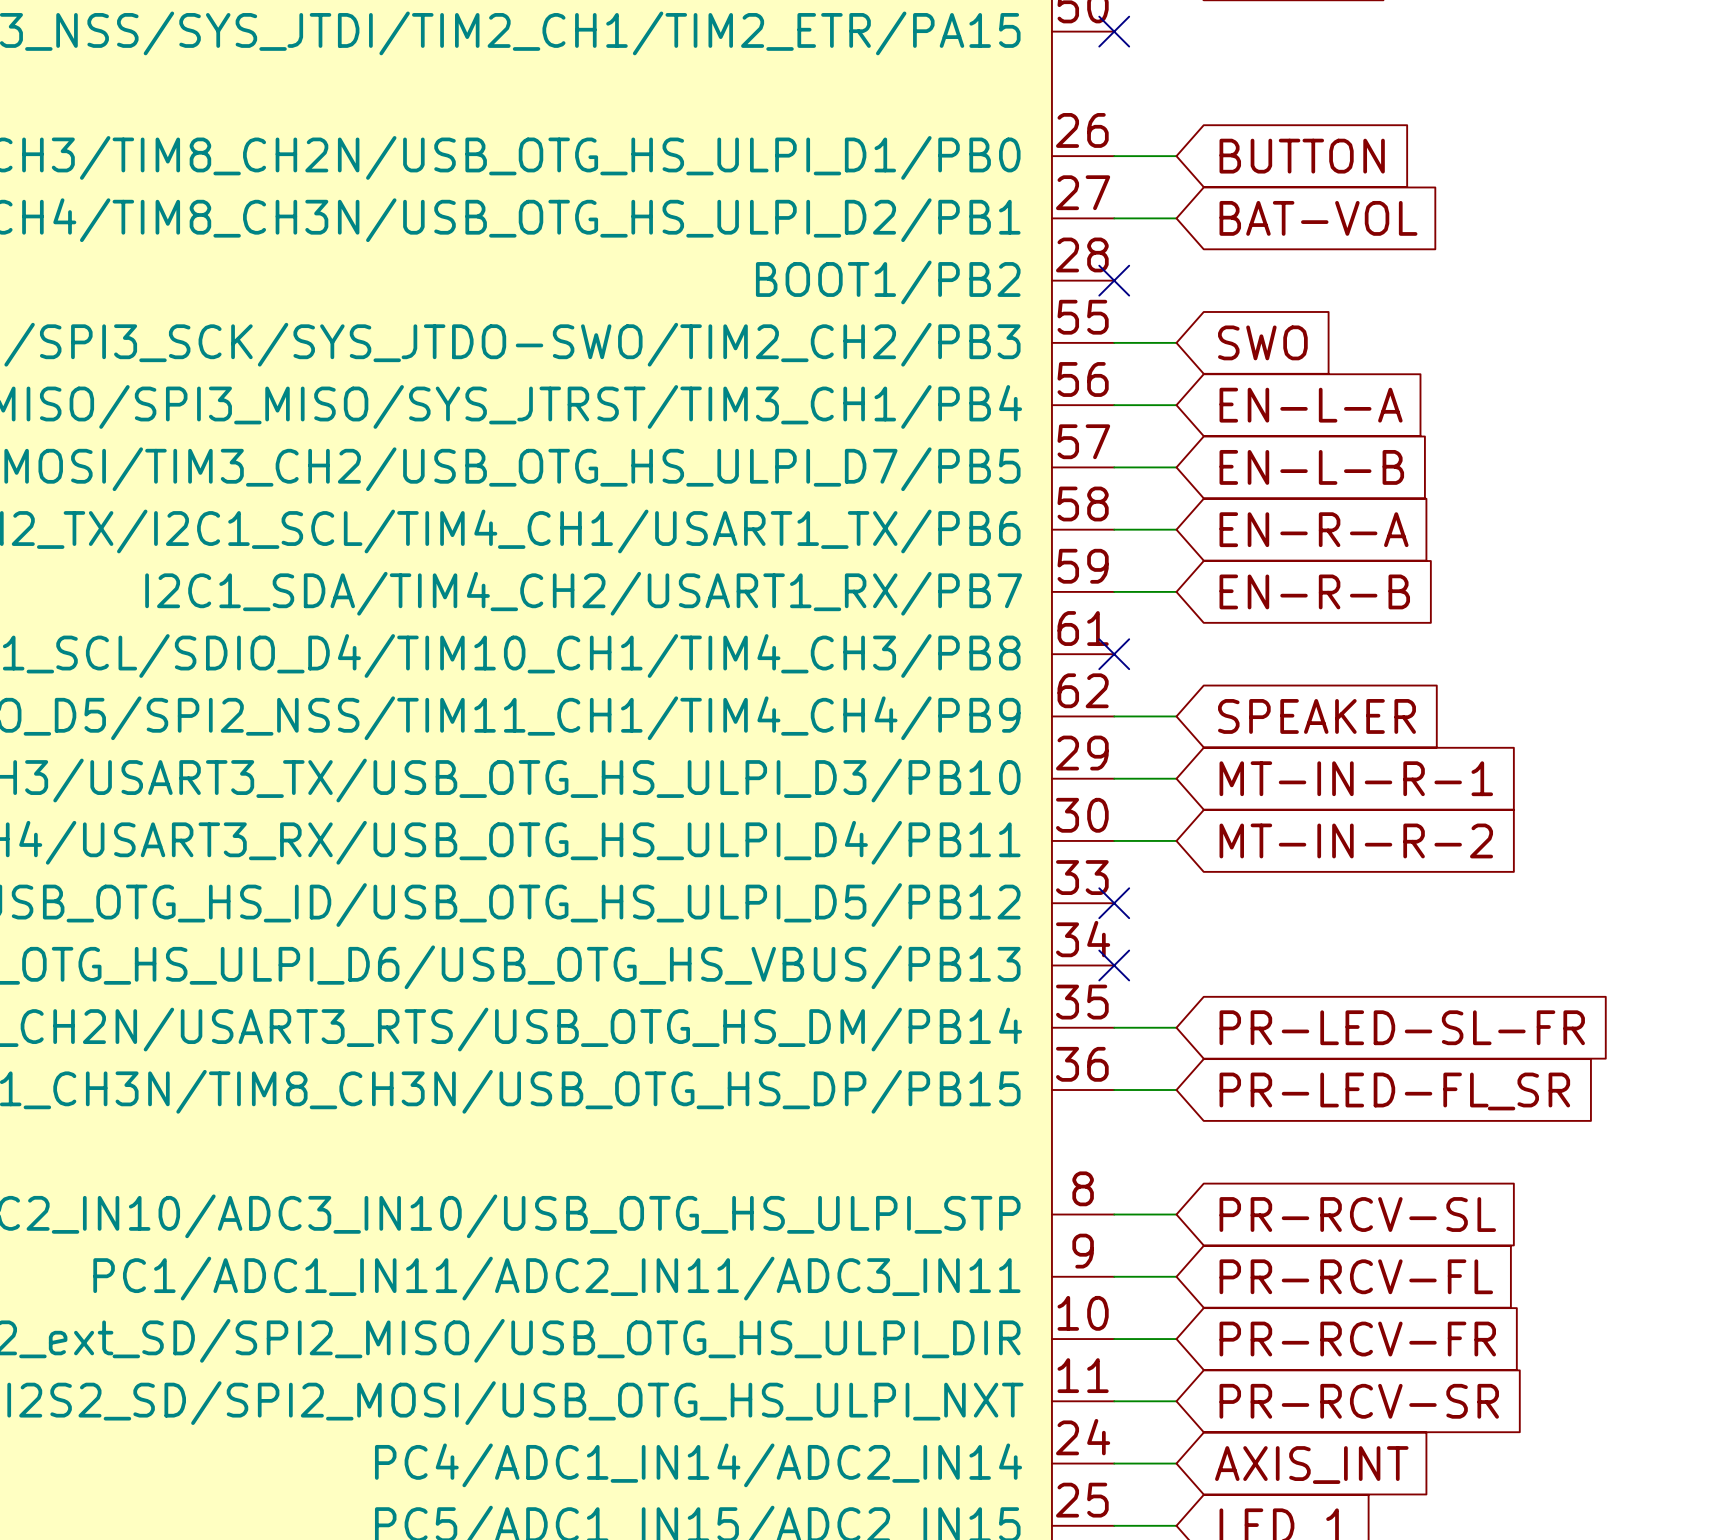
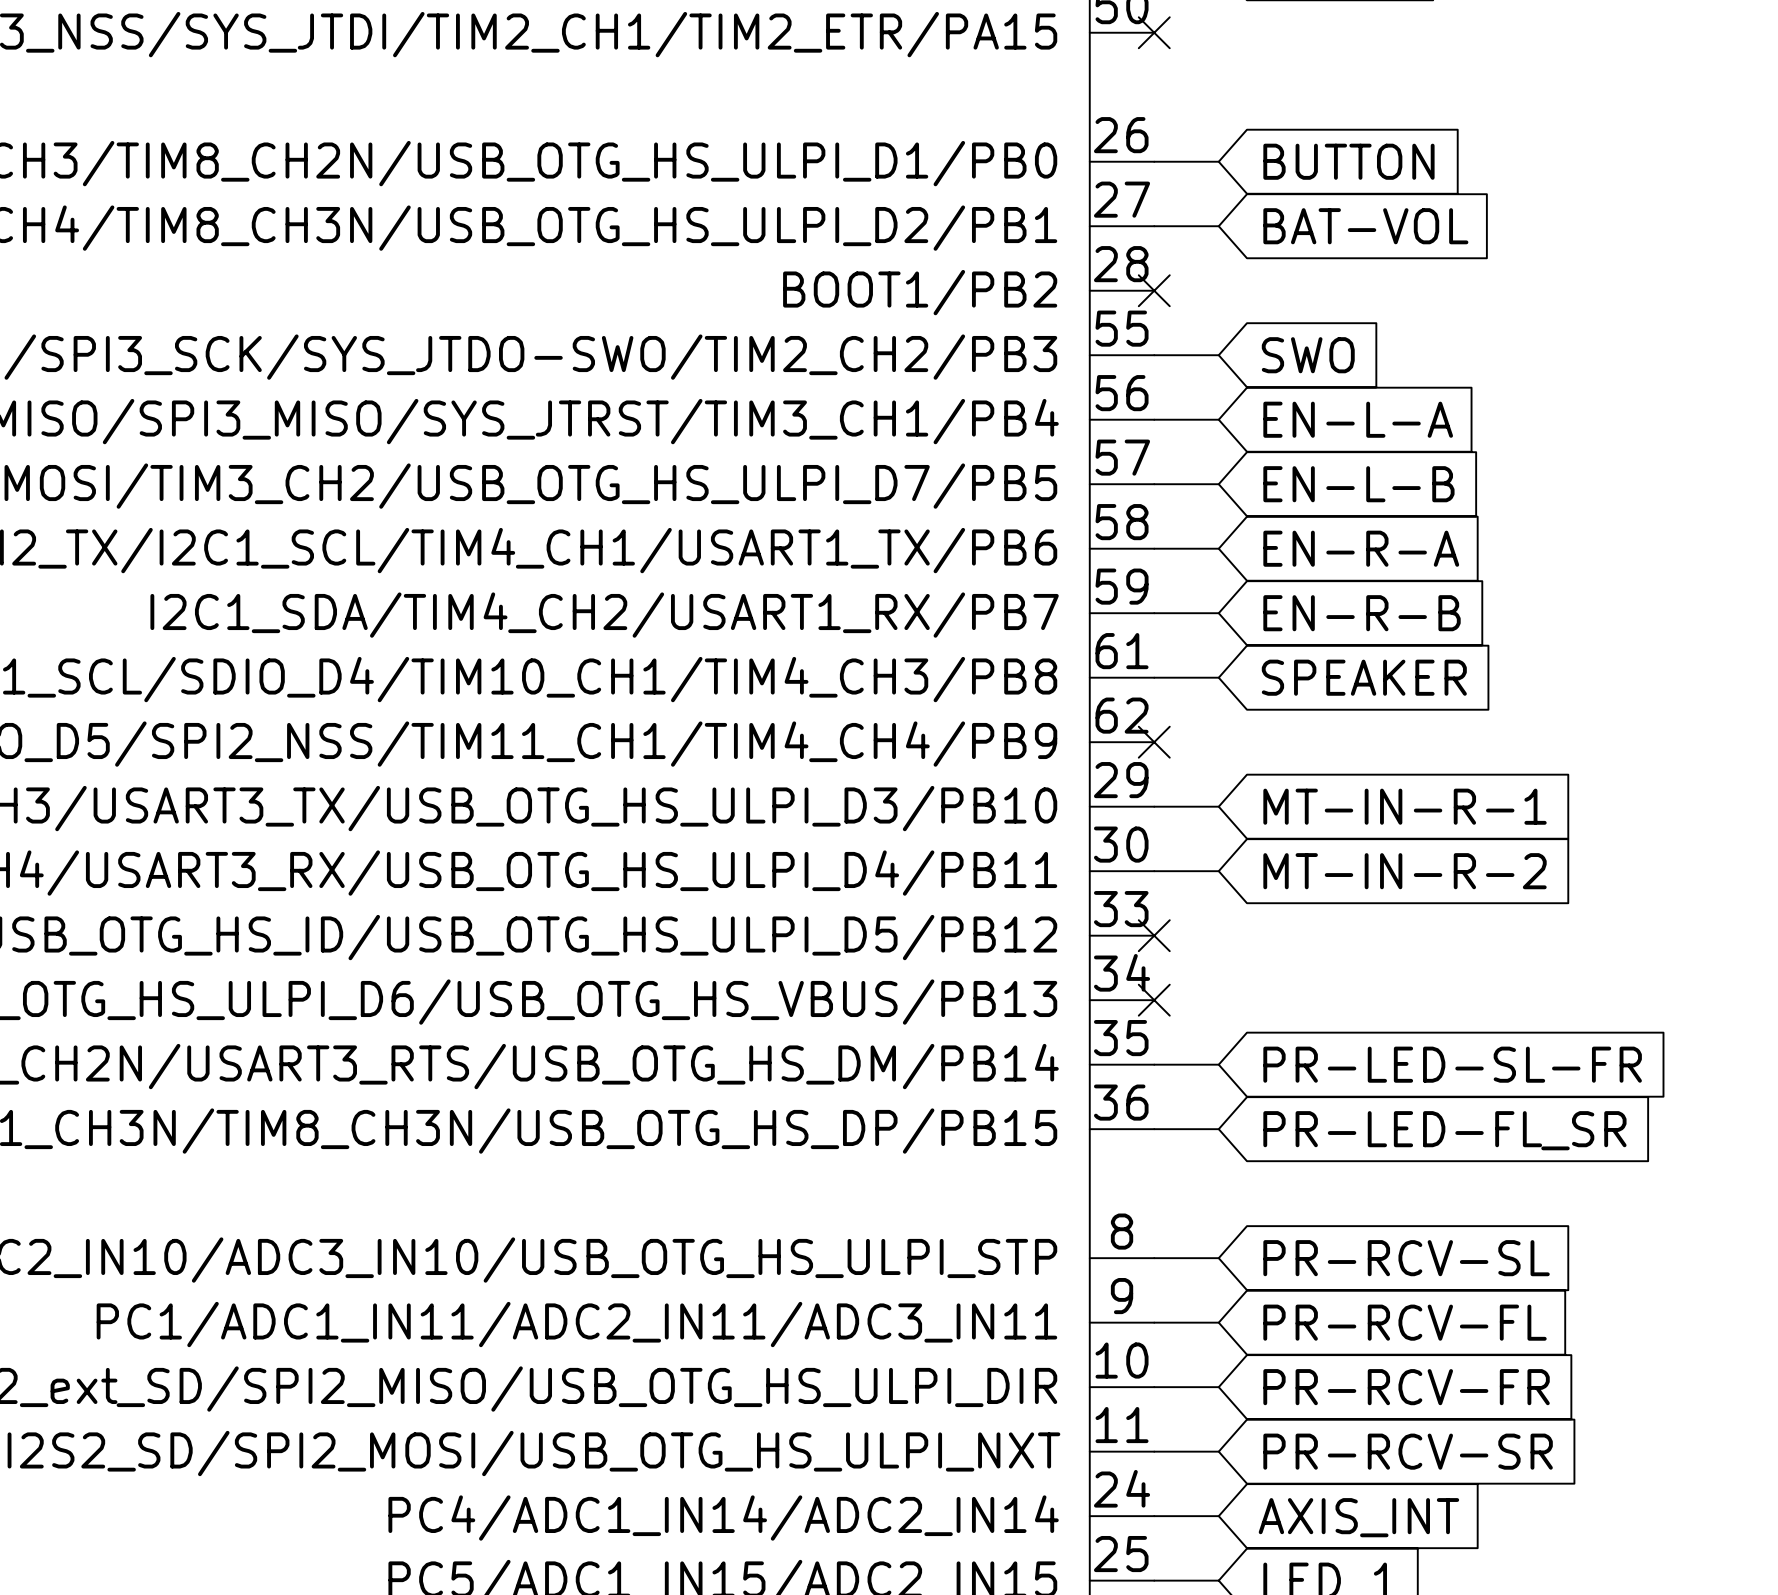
no-connect mark position: (1114, 654) -> (1154, 742)
wire: (1114, 716) (1176, 716) -> (1154, 677) (1218, 677)
global label position: SPEAKER (1316, 716) -> SPEAKER (1364, 677)

